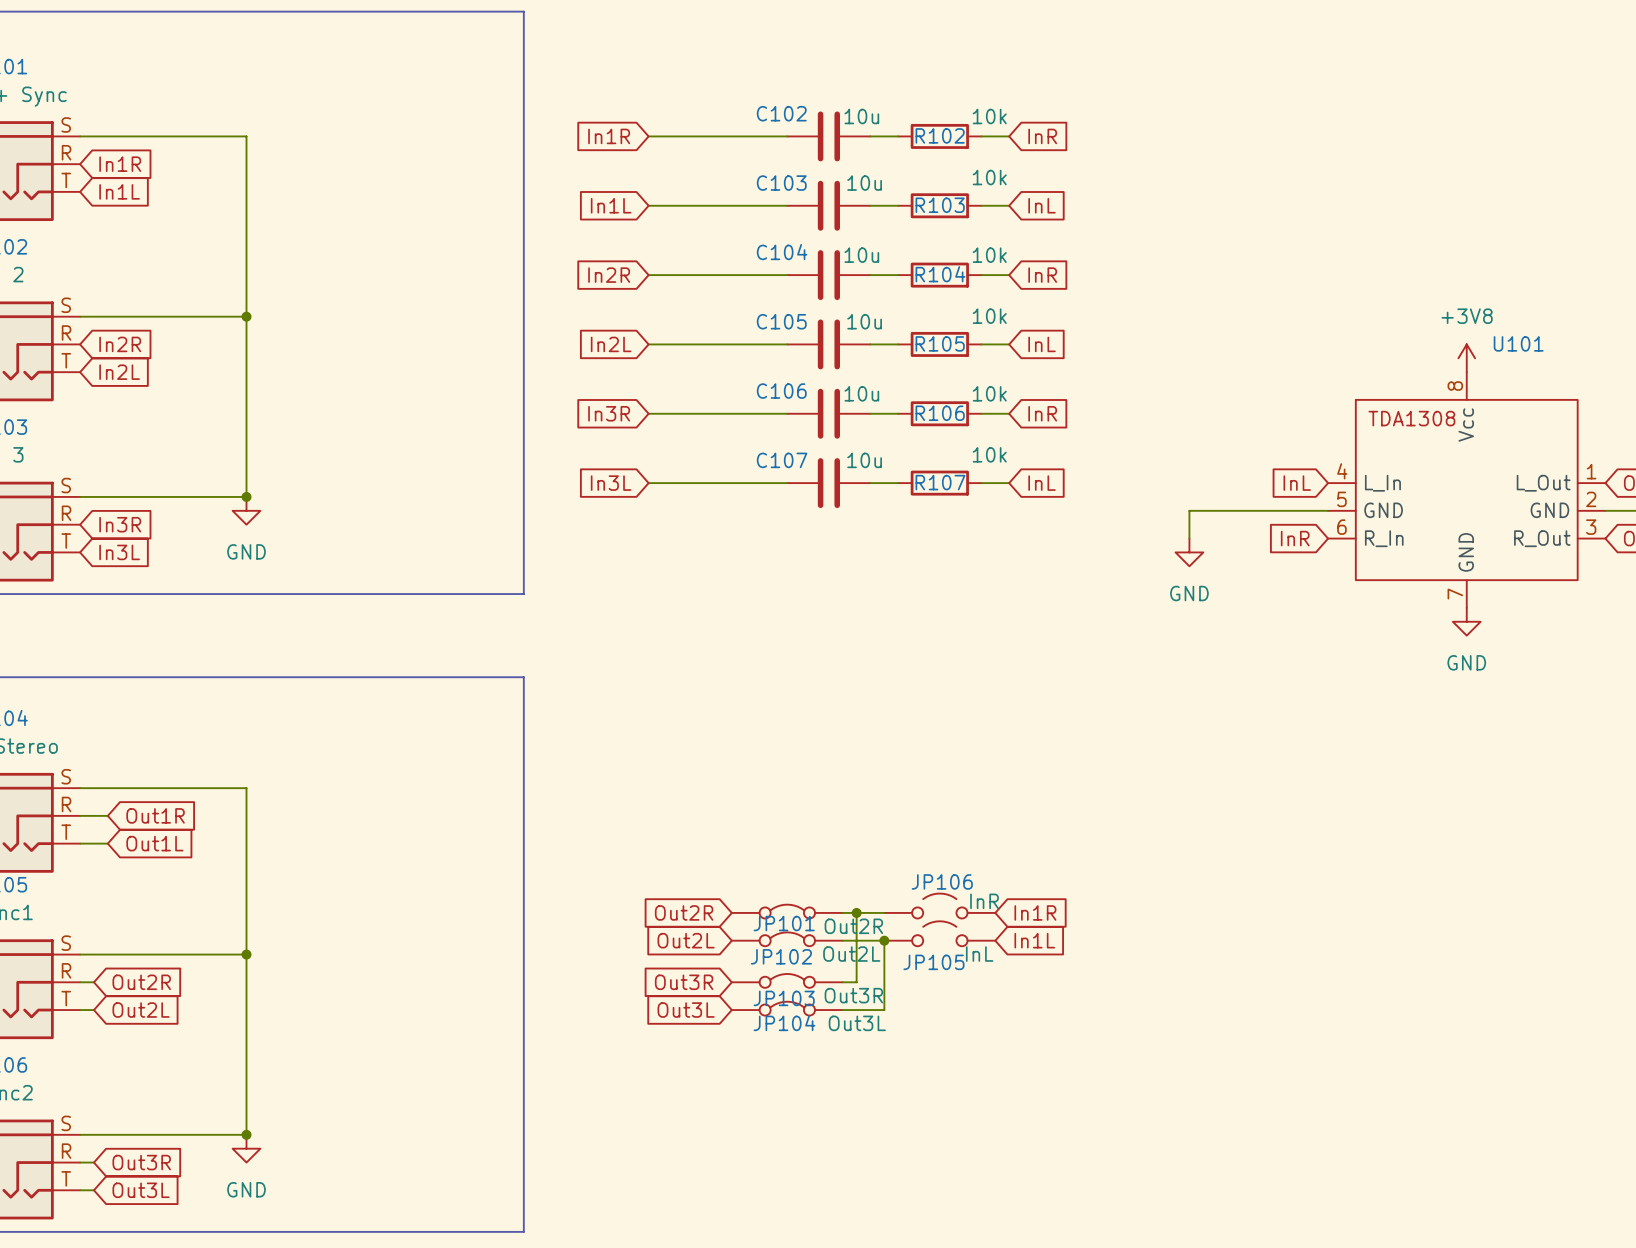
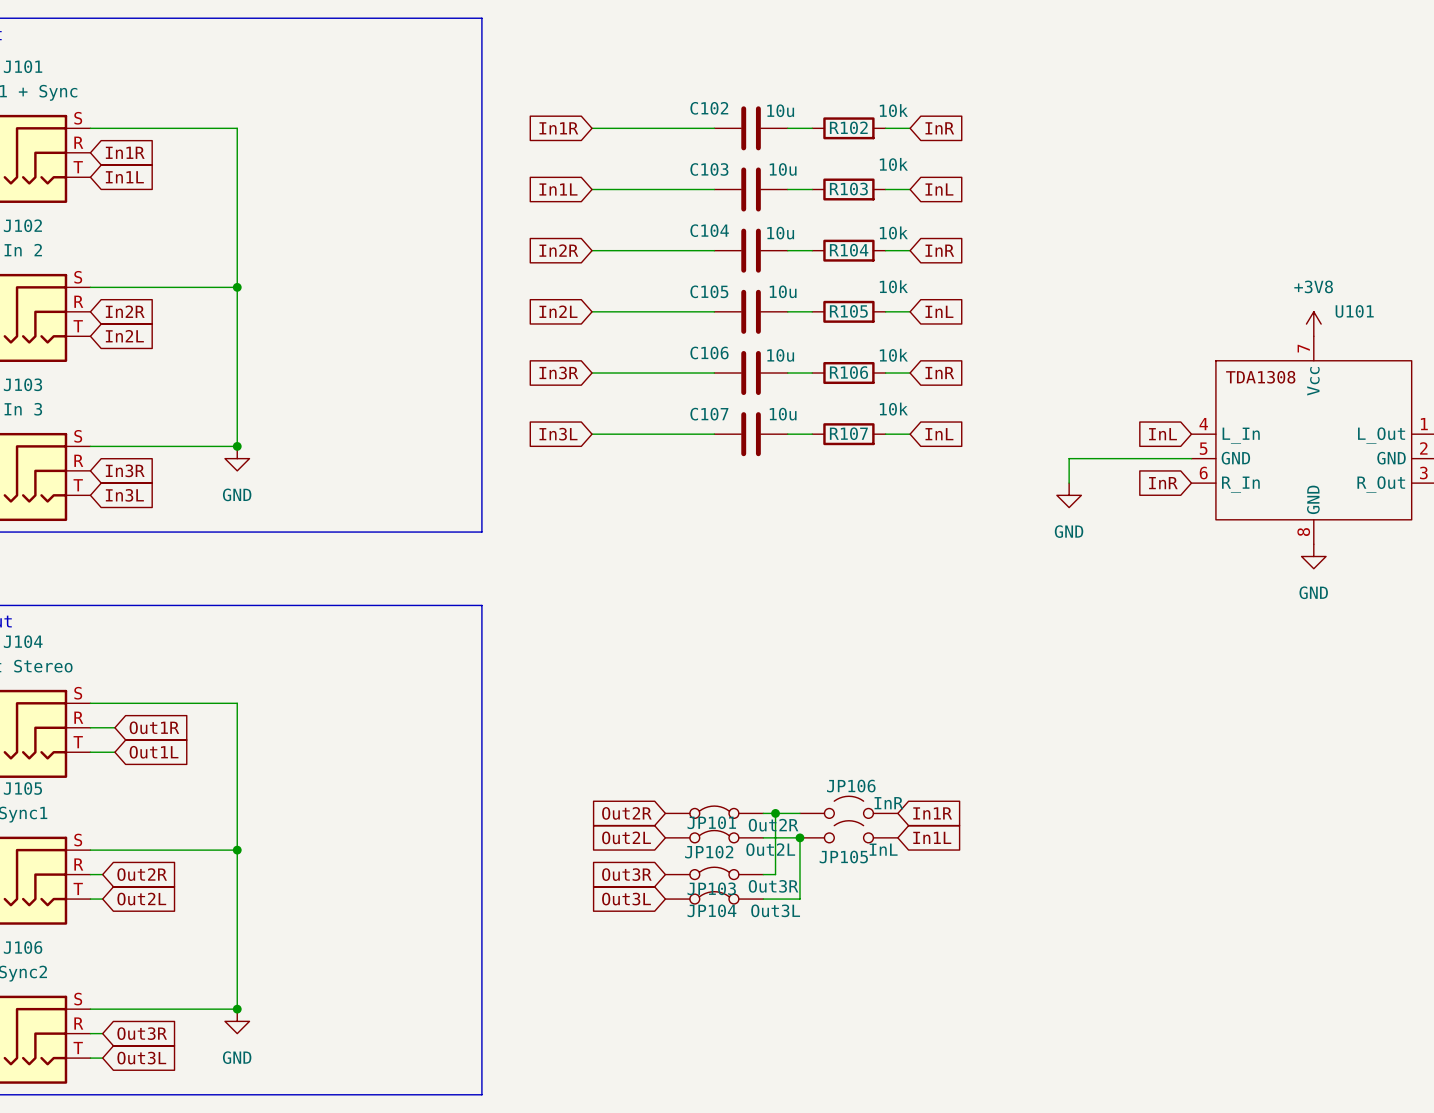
U101 pin number: 8 (1455, 386) -> 7 (1303, 348)
U101 pin number: 7 (1455, 594) -> 8 (1303, 532)

